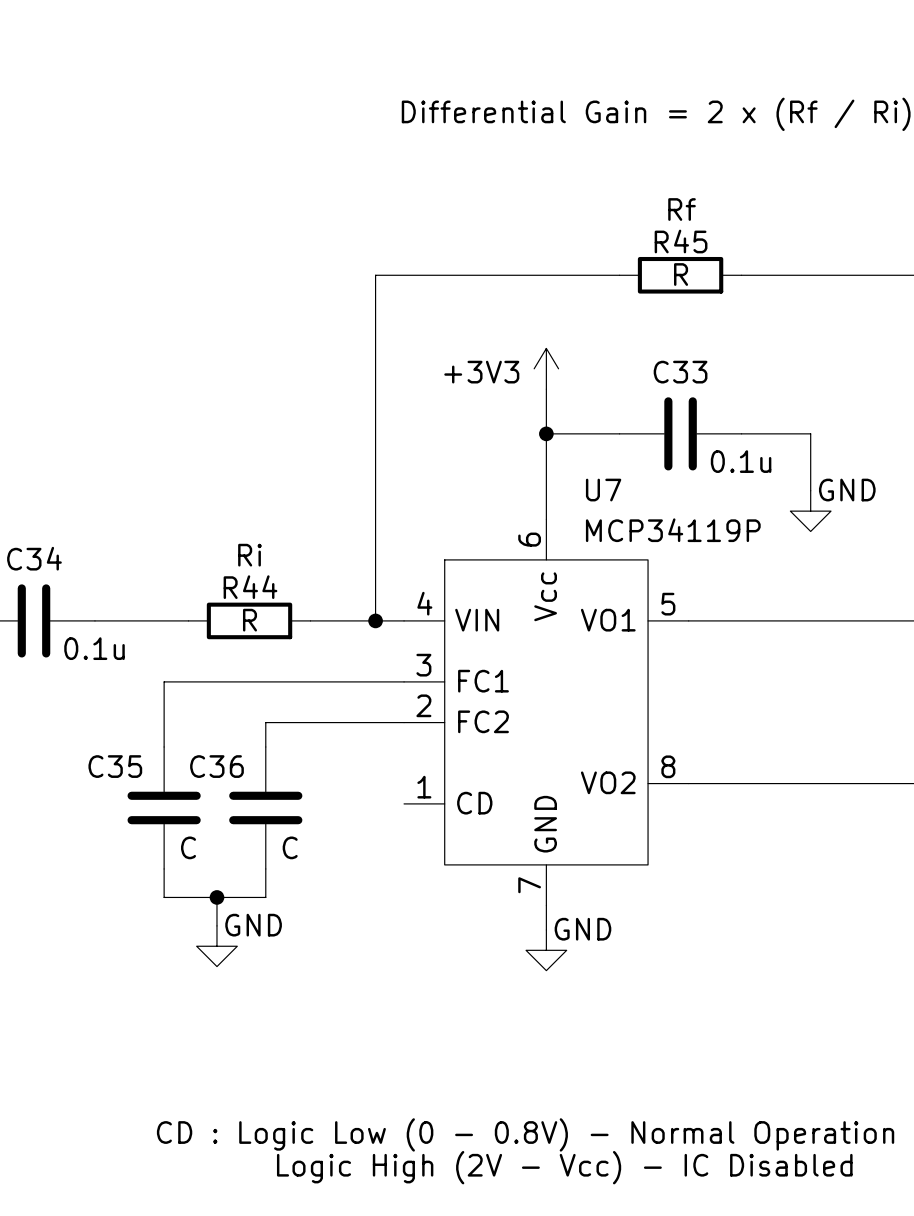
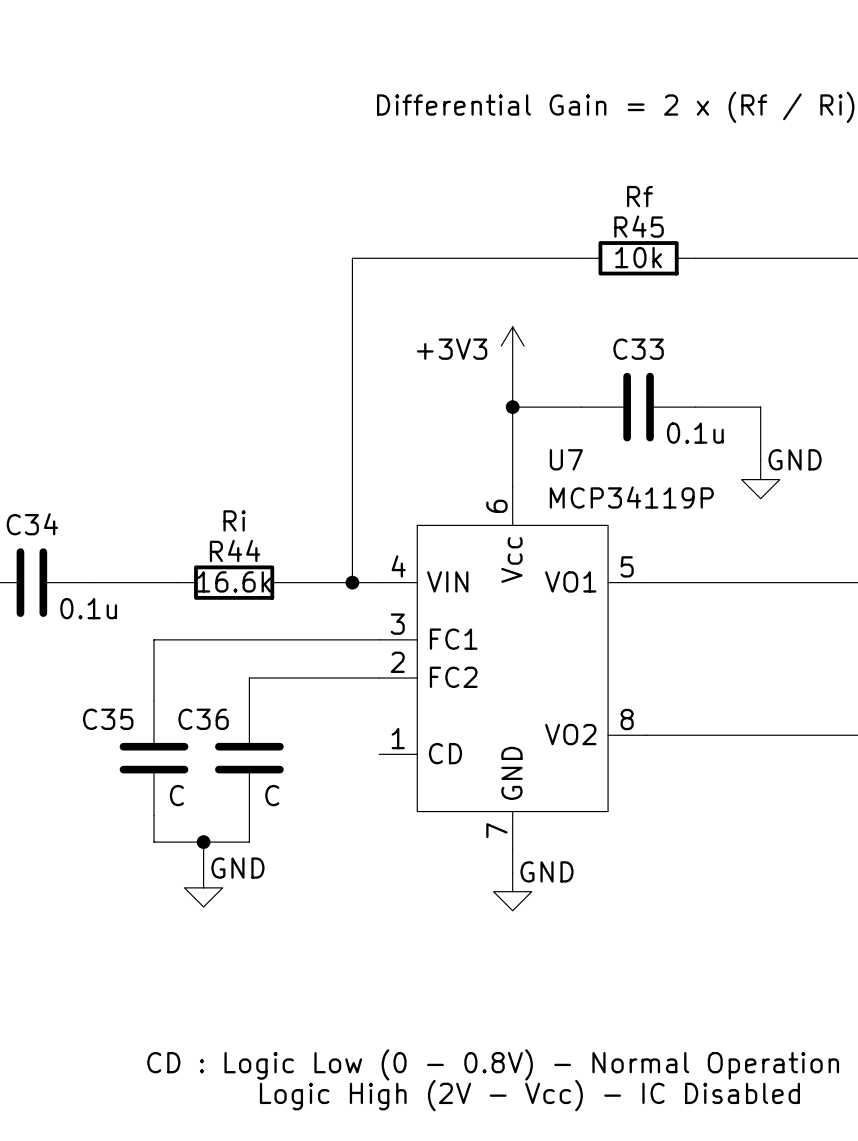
R45 value: R (681, 274) -> 10k (638, 257)
R44 value: R (250, 620) -> 16.6k (234, 581)

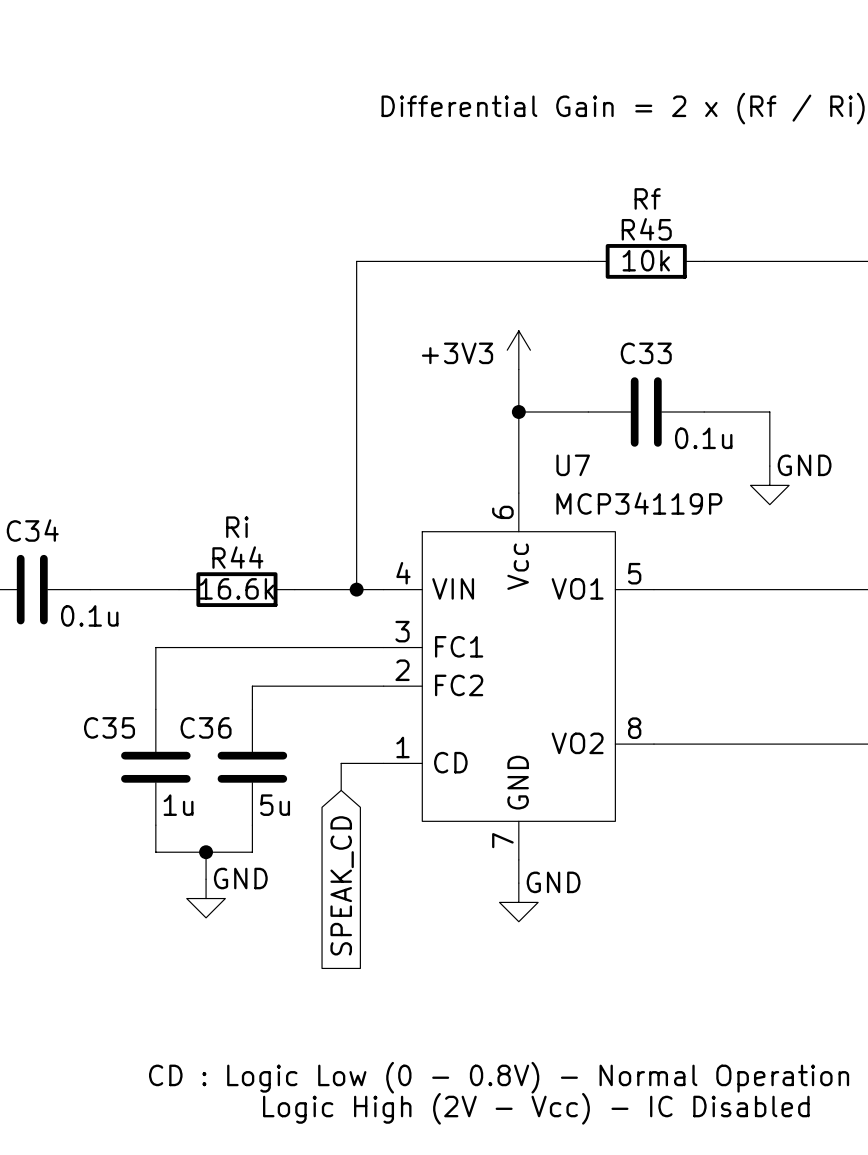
wire: none -> (383, 763) (341, 763) (341, 790)
C35 value: C (176, 795) -> 1u (178, 805)
C36 value: C (272, 795) -> 5u (275, 805)
global label: none -> SPEAK_CD (342, 885)

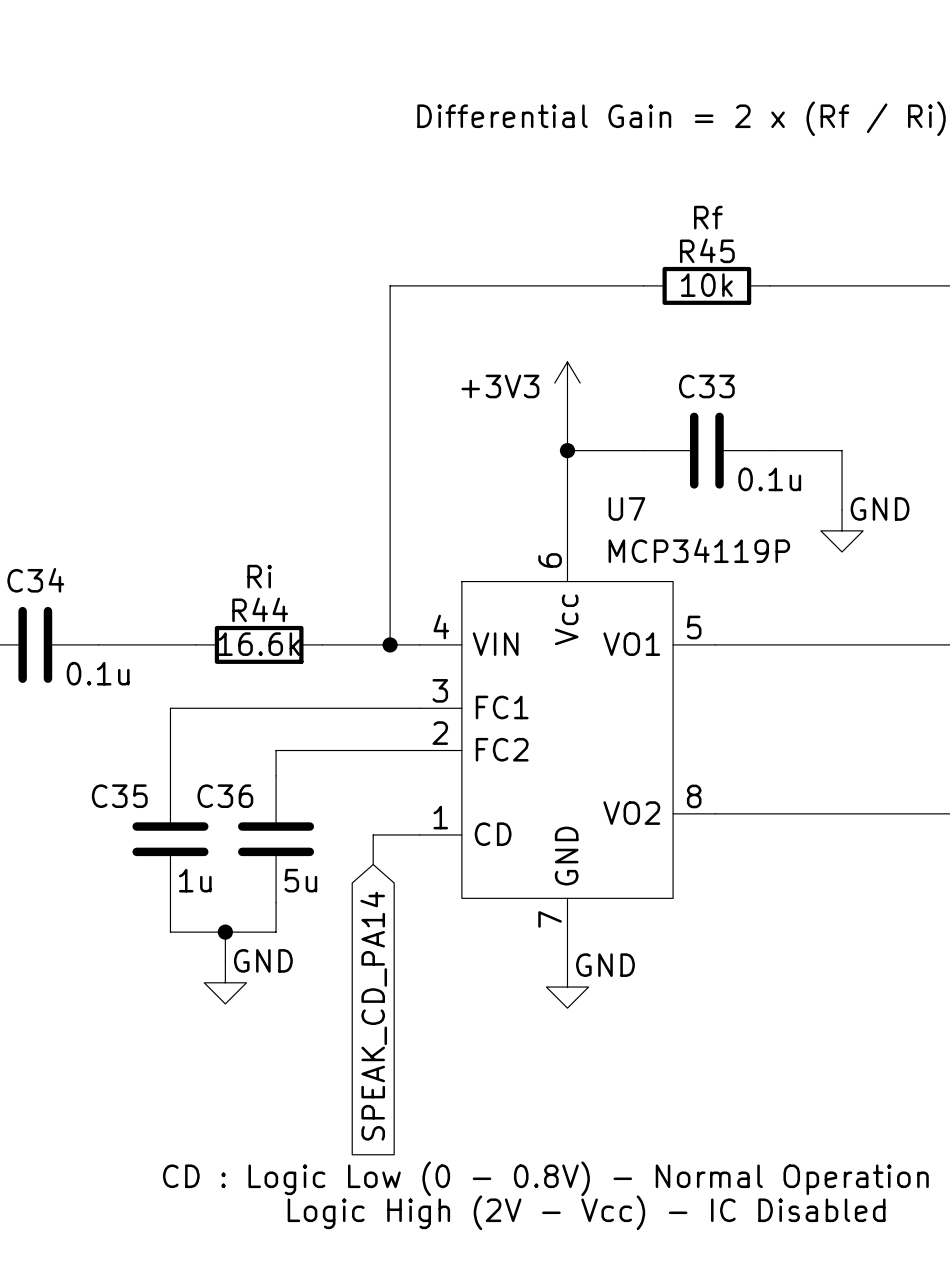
global label: SPEAK_CD (342, 885) -> SPEAK_CD_PA14 (373, 1016)

